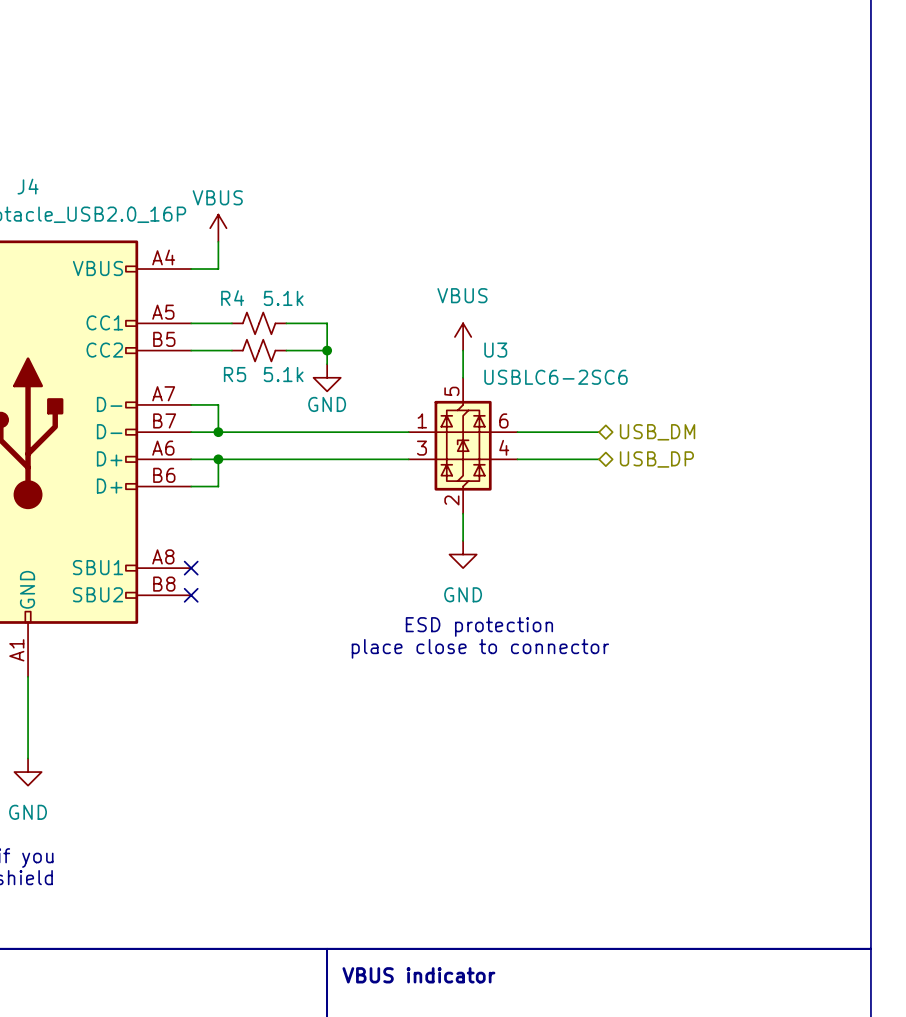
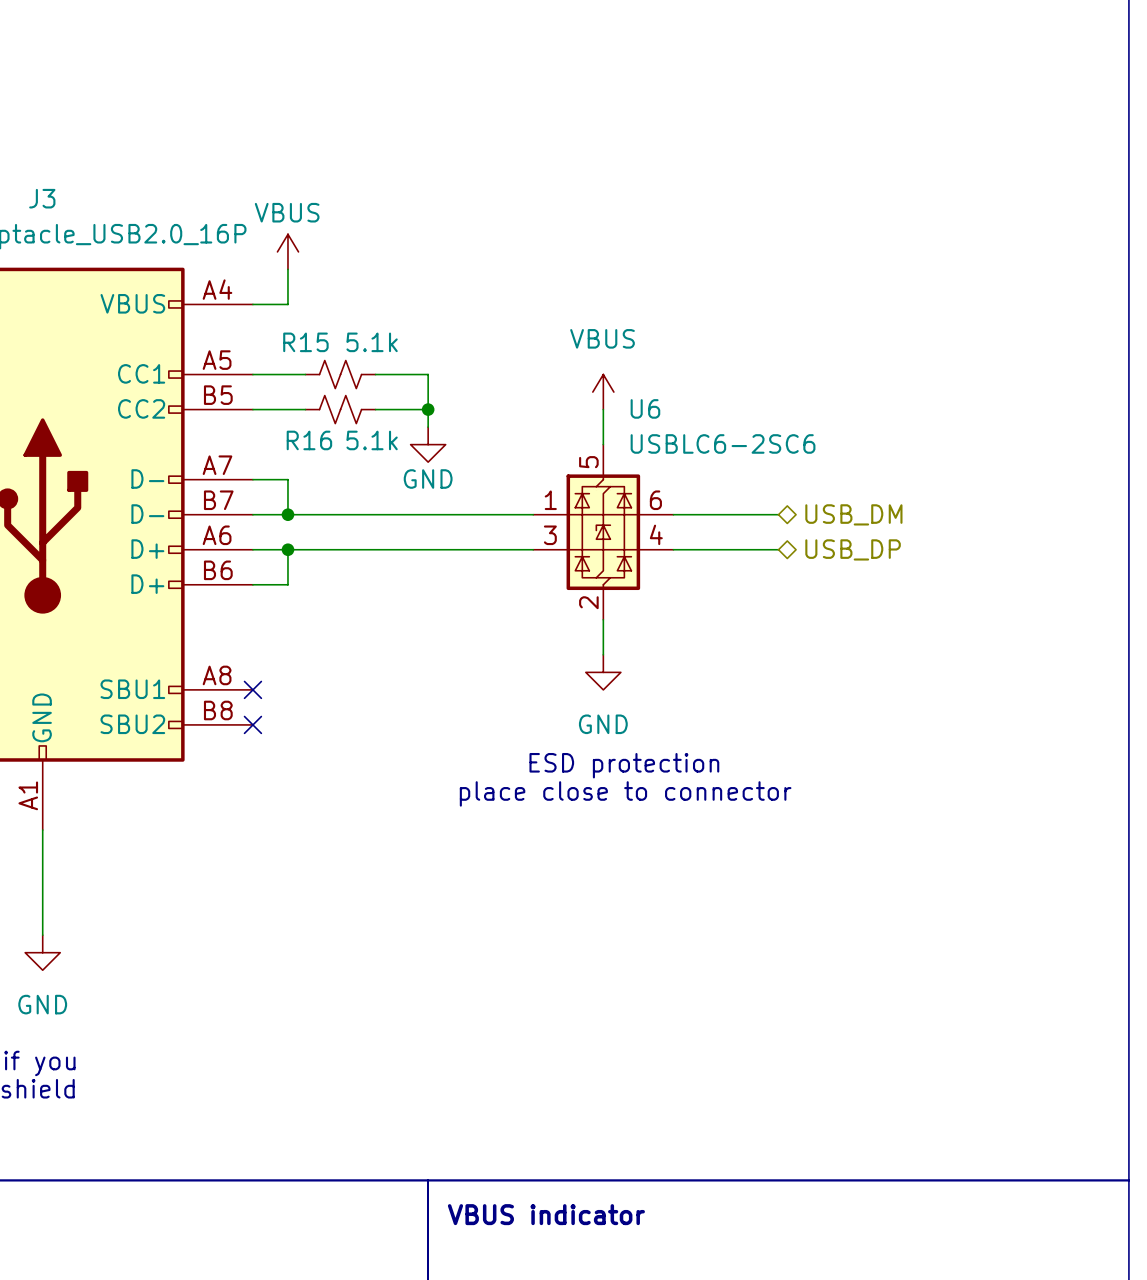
J4 name: J4 (28, 186) -> J3 (42, 198)
R4 name: R4 (232, 298) -> R15 (305, 342)
U3 name: U3 (495, 350) -> U6 (645, 408)
R5 name: R5 (235, 374) -> R16 (309, 440)

